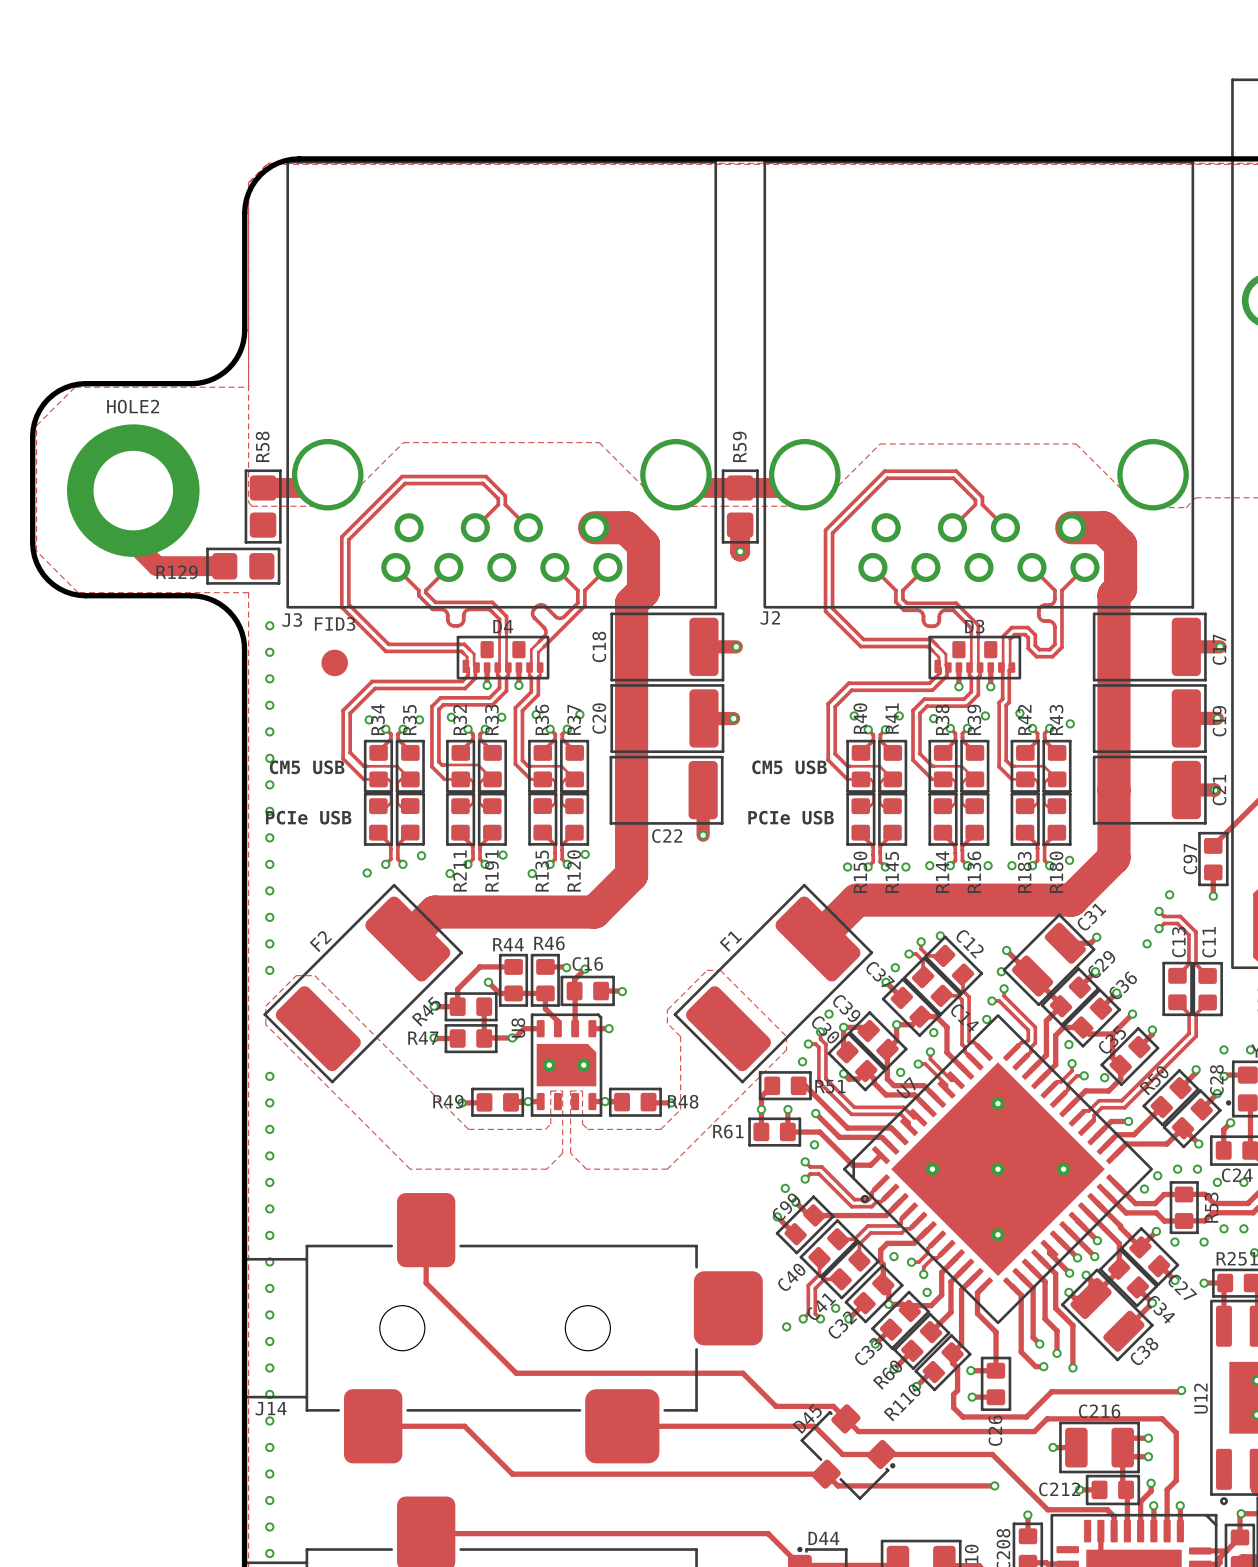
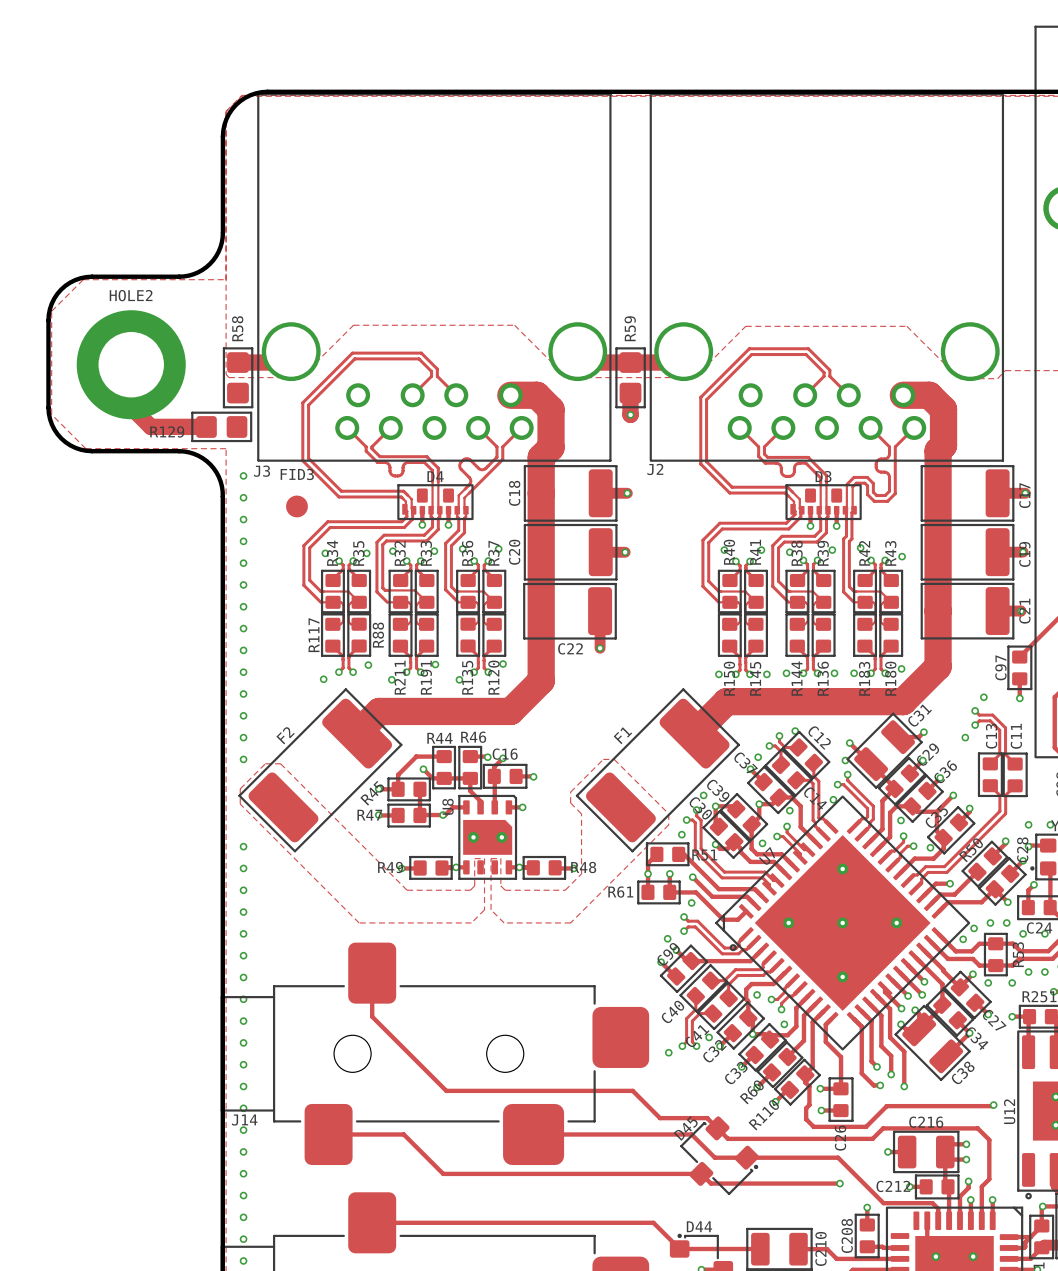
text: CM5 USB (307, 767) -> none
text: CM5 USB (789, 767) -> none
text: PCIe USB (308, 817) -> none
text: PCIe USB (791, 817) -> none
R117 name: none -> R117 (314, 635)
R88 name: none -> R88 (378, 635)

